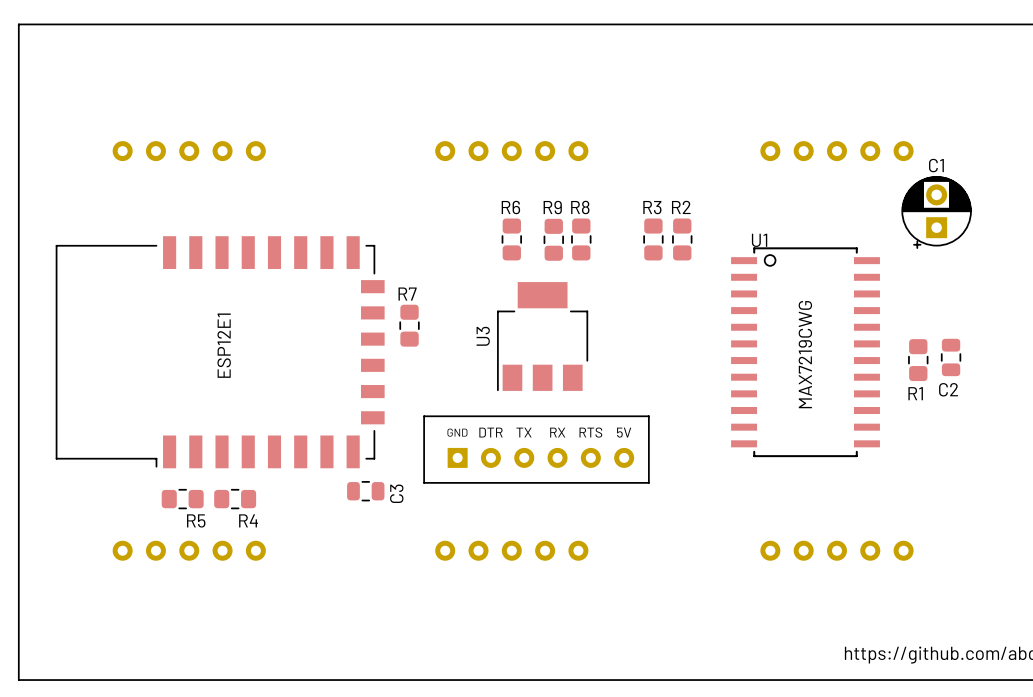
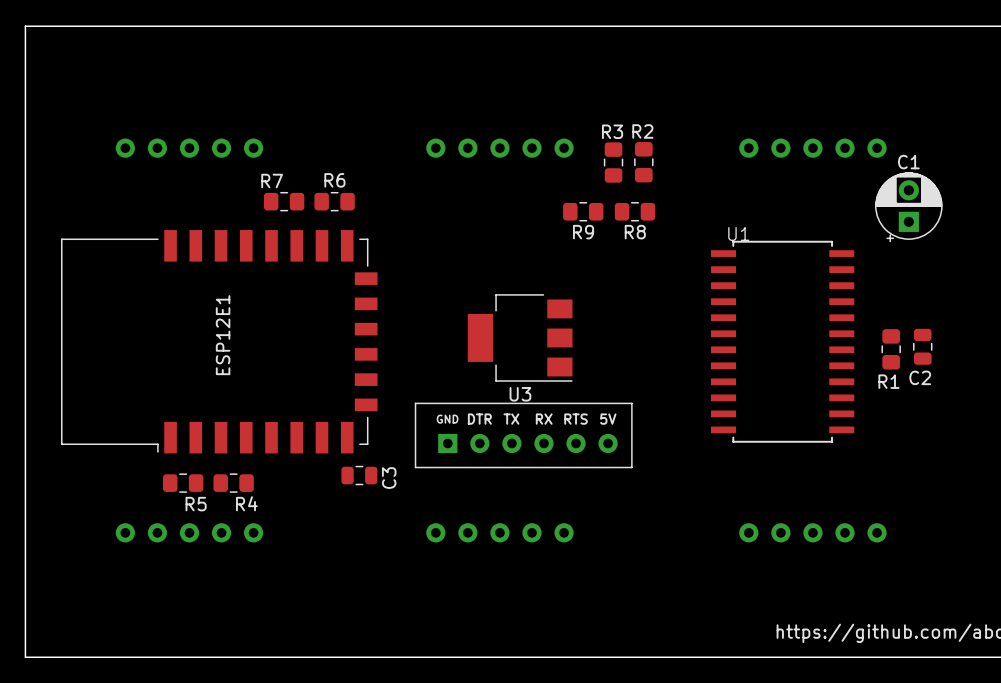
R9 name position: R9 (552, 207) -> R9 (583, 232)
R8 name position: R8 (580, 207) -> R8 (635, 232)
R6 rotation: 0° (511, 239) -> 90° clockwise (334, 201)
R6 position: (511, 239) -> (334, 201)
R9 rotation: 0° (553, 239) -> 90° clockwise (583, 211)
R9 position: (553, 239) -> (583, 211)
R8 rotation: 0° (581, 239) -> 90° clockwise (634, 211)
R8 position: (581, 239) -> (634, 211)
R3 position: (653, 239) -> (613, 162)
R2 position: (682, 239) -> (643, 162)
drawing: [763, 254, 777, 267] -> none
R7 rotation: 0° (409, 325) -> 90° clockwise (284, 201)
R7 position: (409, 325) -> (284, 201)
U3 rotation: 0° (542, 336) -> 90° counterclockwise (520, 337)
text: MAX7219CWG (805, 354) -> none

